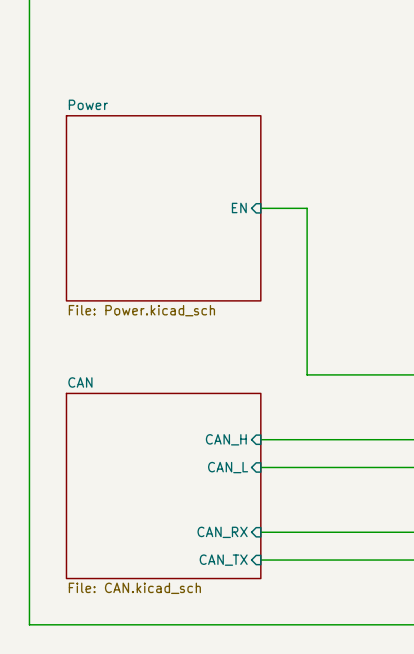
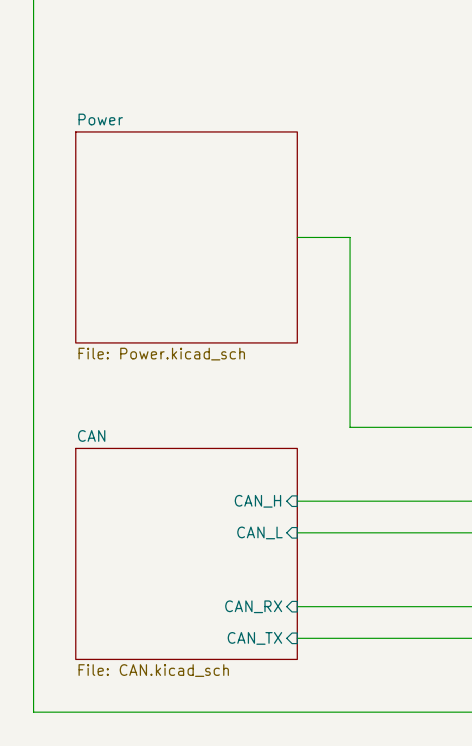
sheet pin: EN (239, 207) -> none

